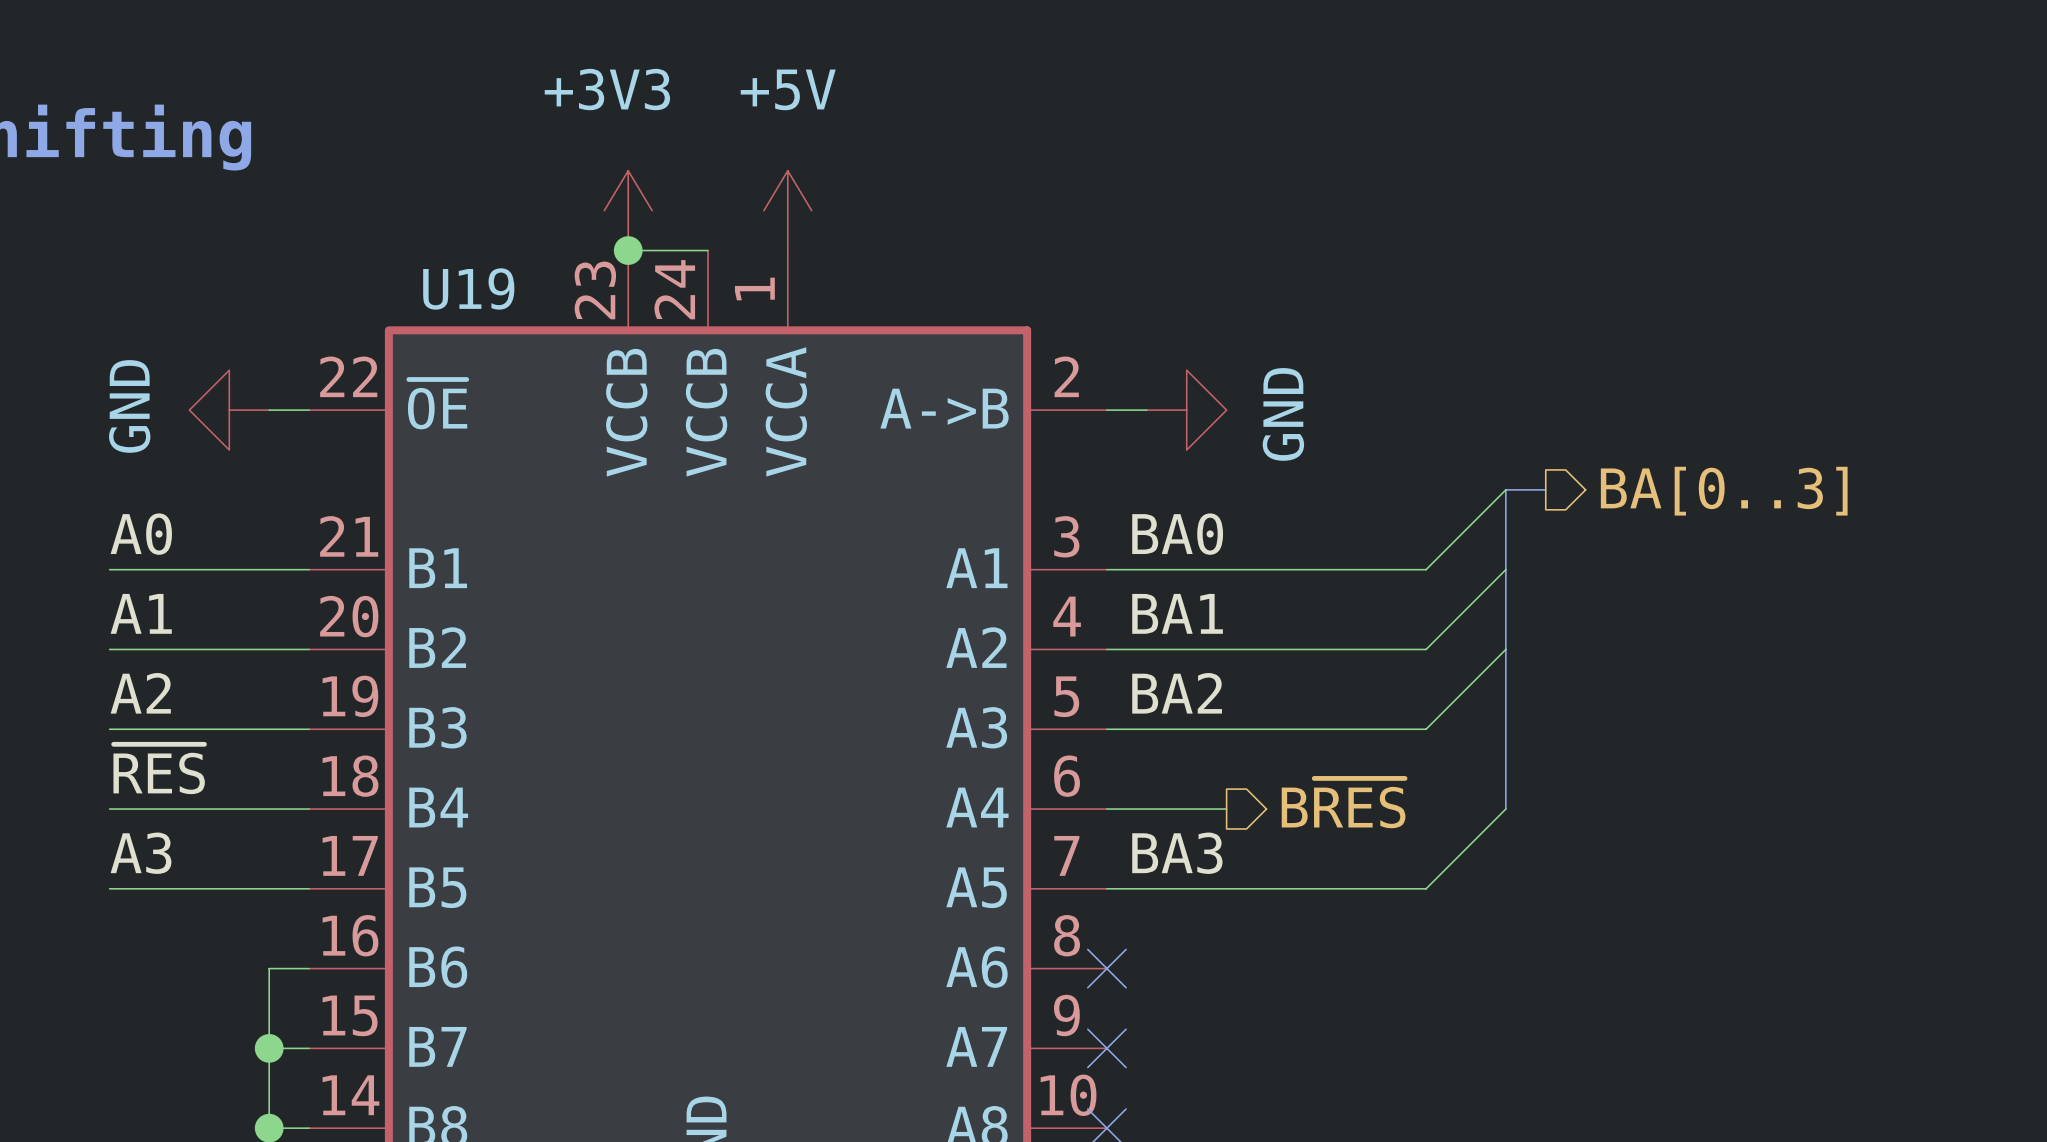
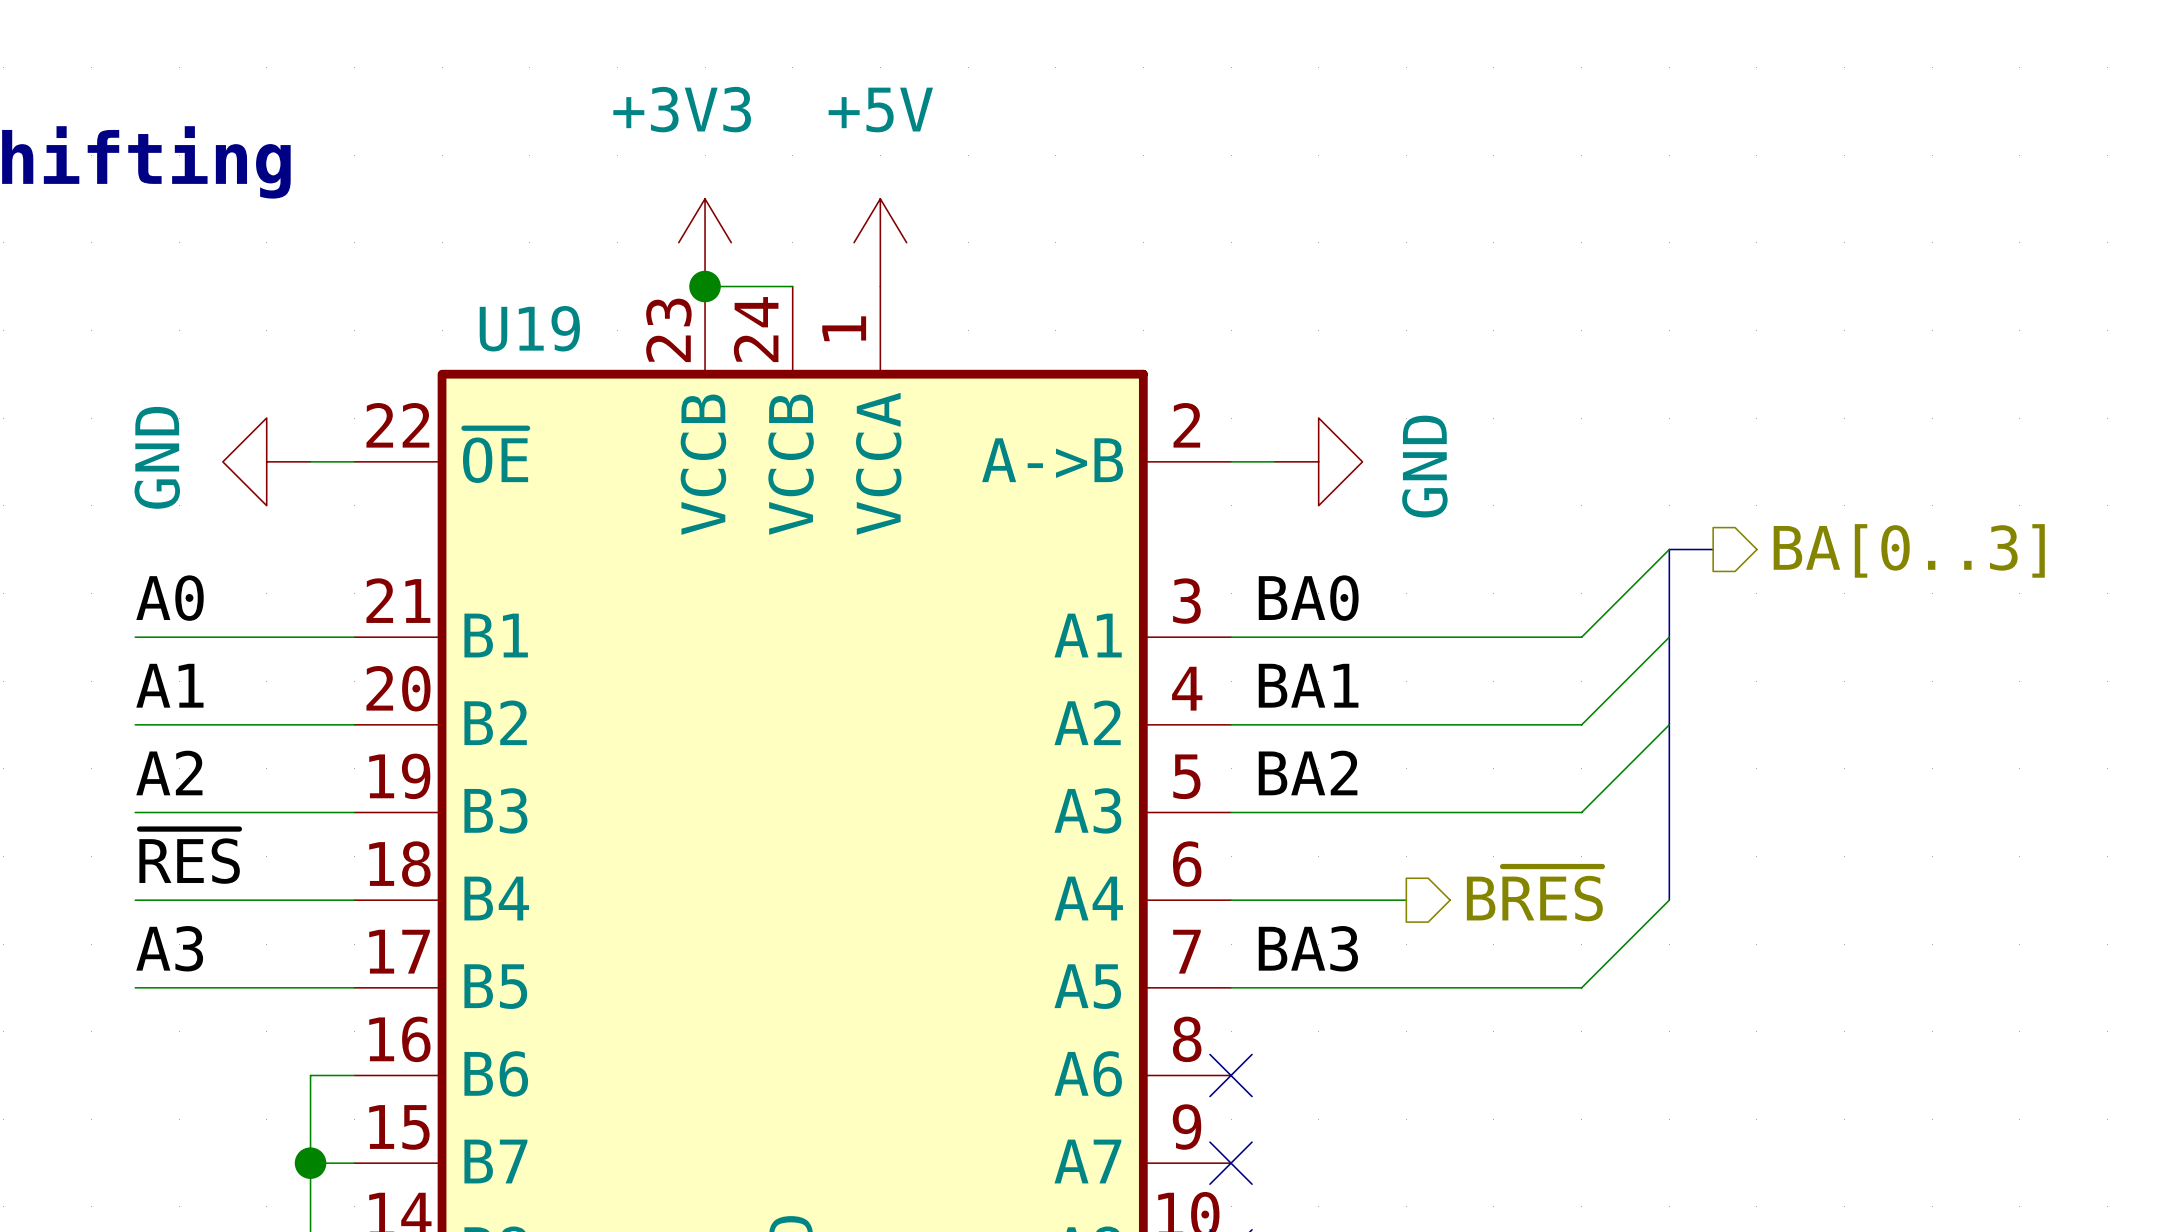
hierarchical label position: B~{RES} (1343, 803) -> B~{RES} (1534, 893)
wire: none -> (1362, 900) (1406, 900)

